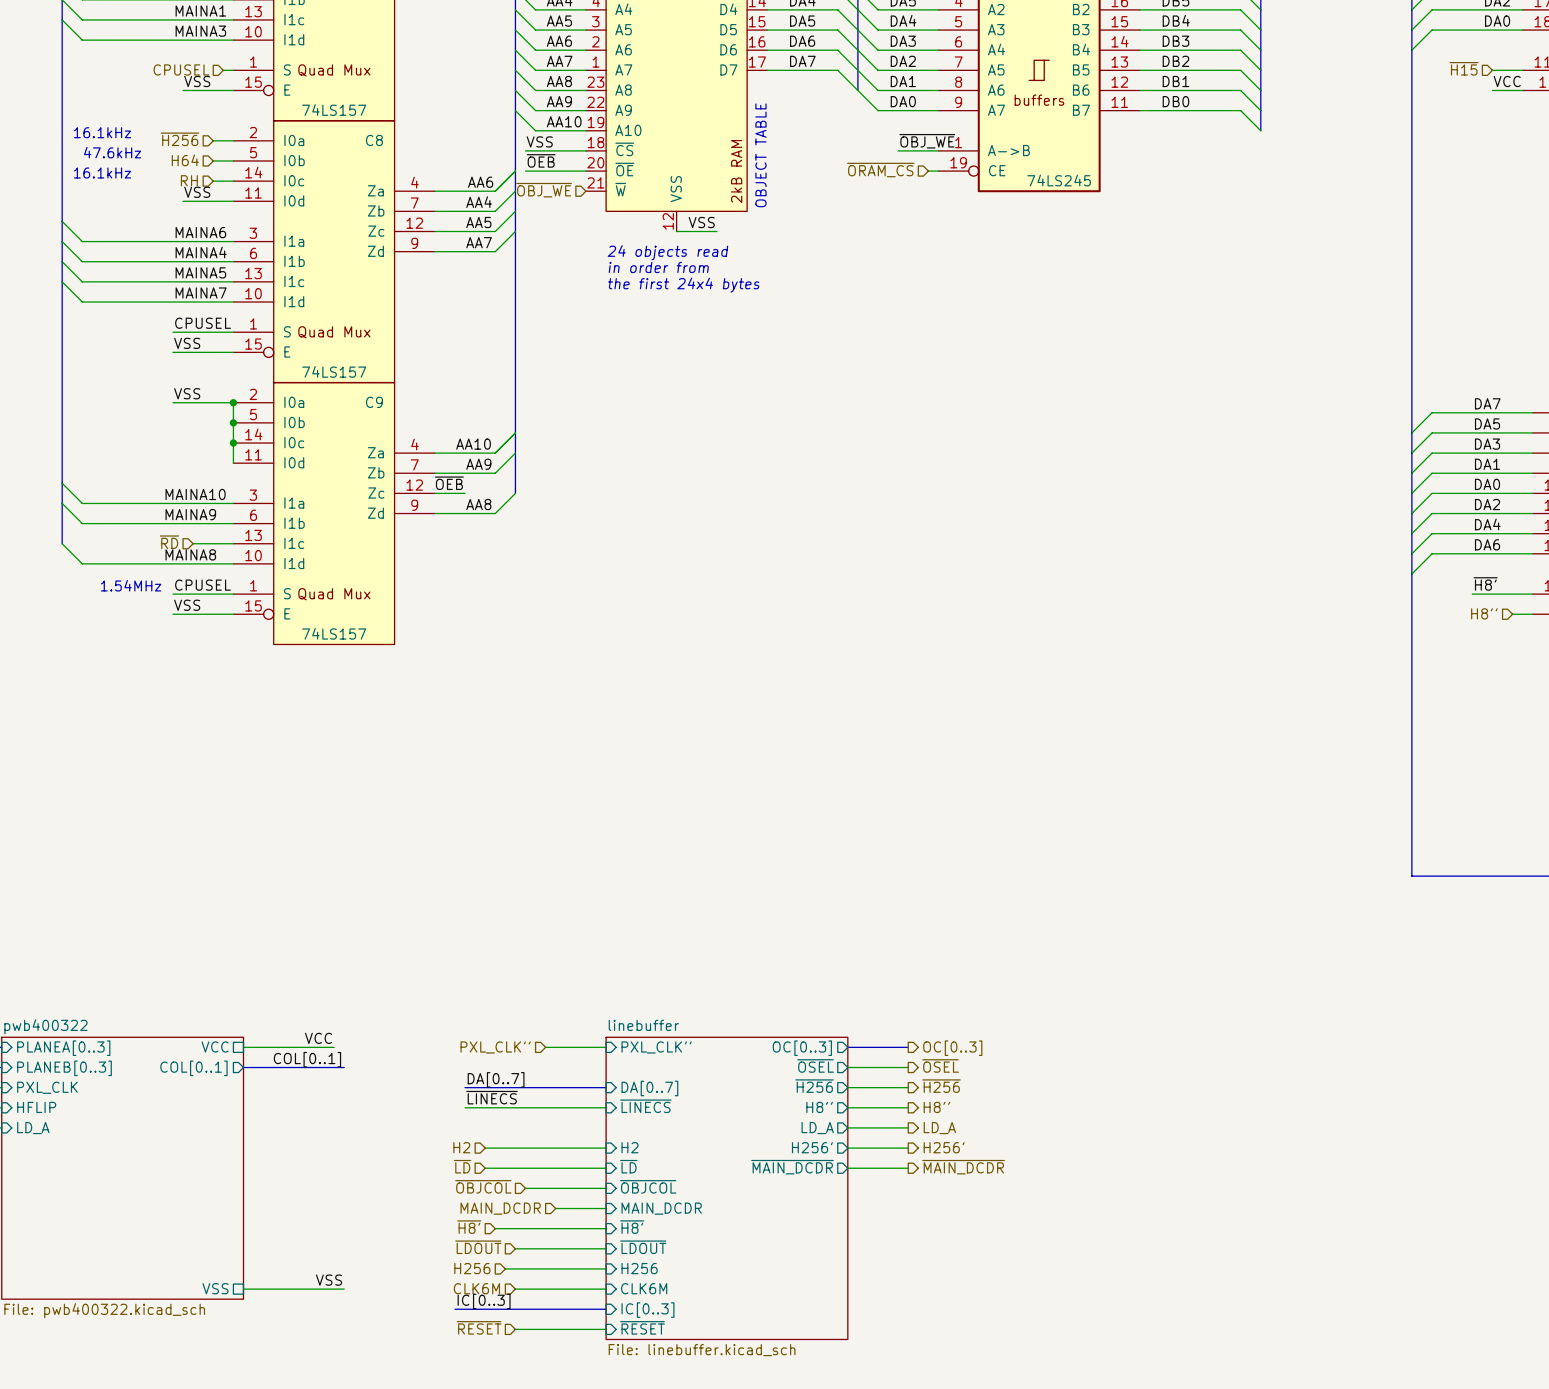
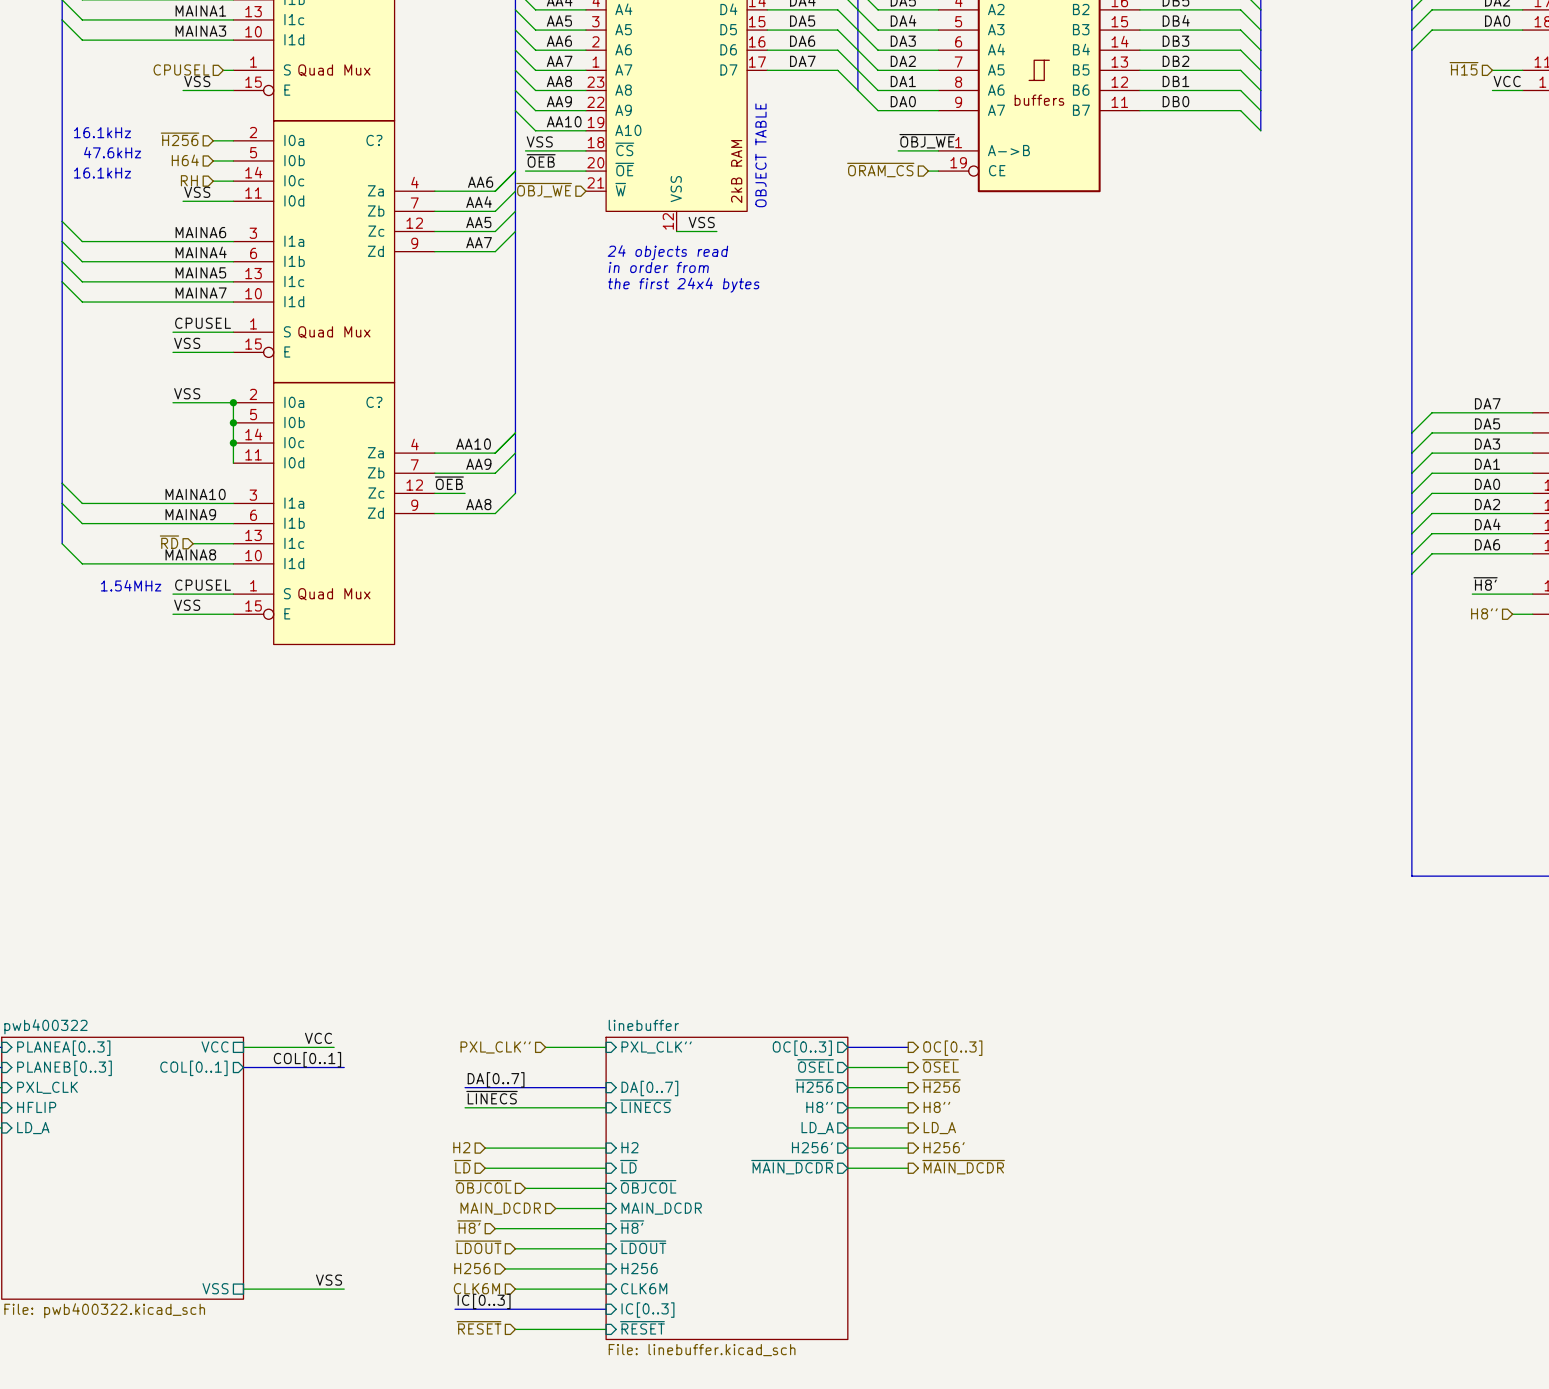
part value: 74LS157 (334, 110) -> none
C8 name: C8 (374, 140) -> C? (374, 140)
part value: 74LS245 (1059, 180) -> none
C8 value: 74LS157 (334, 371) -> none
C9 name: C9 (374, 402) -> C? (374, 402)
C9 value: 74LS157 (334, 633) -> none

